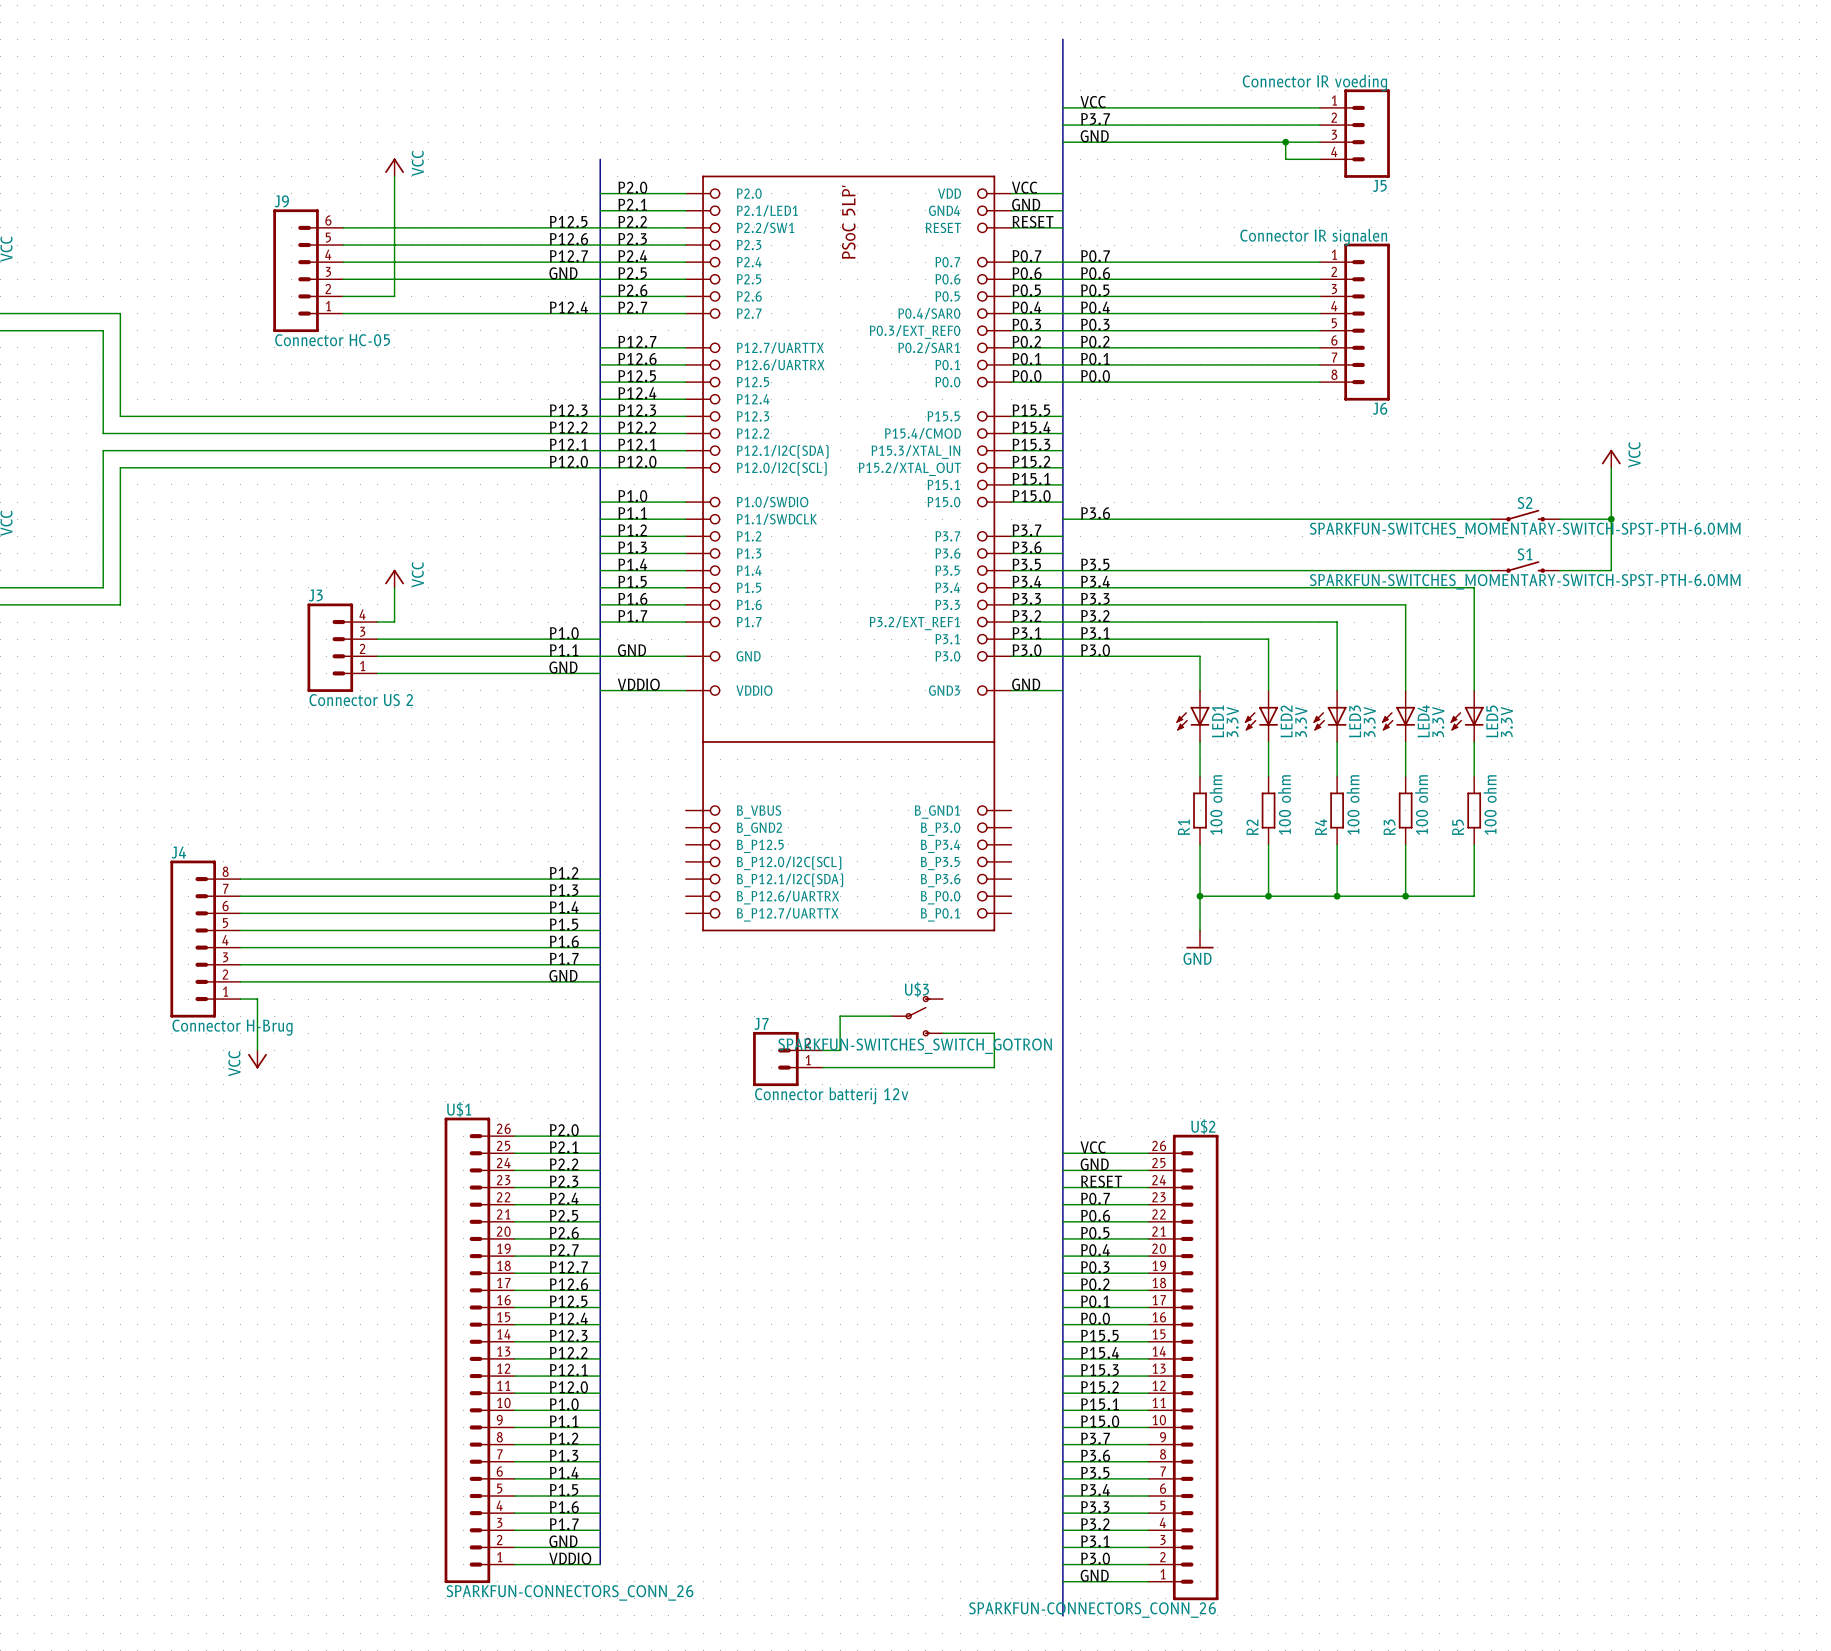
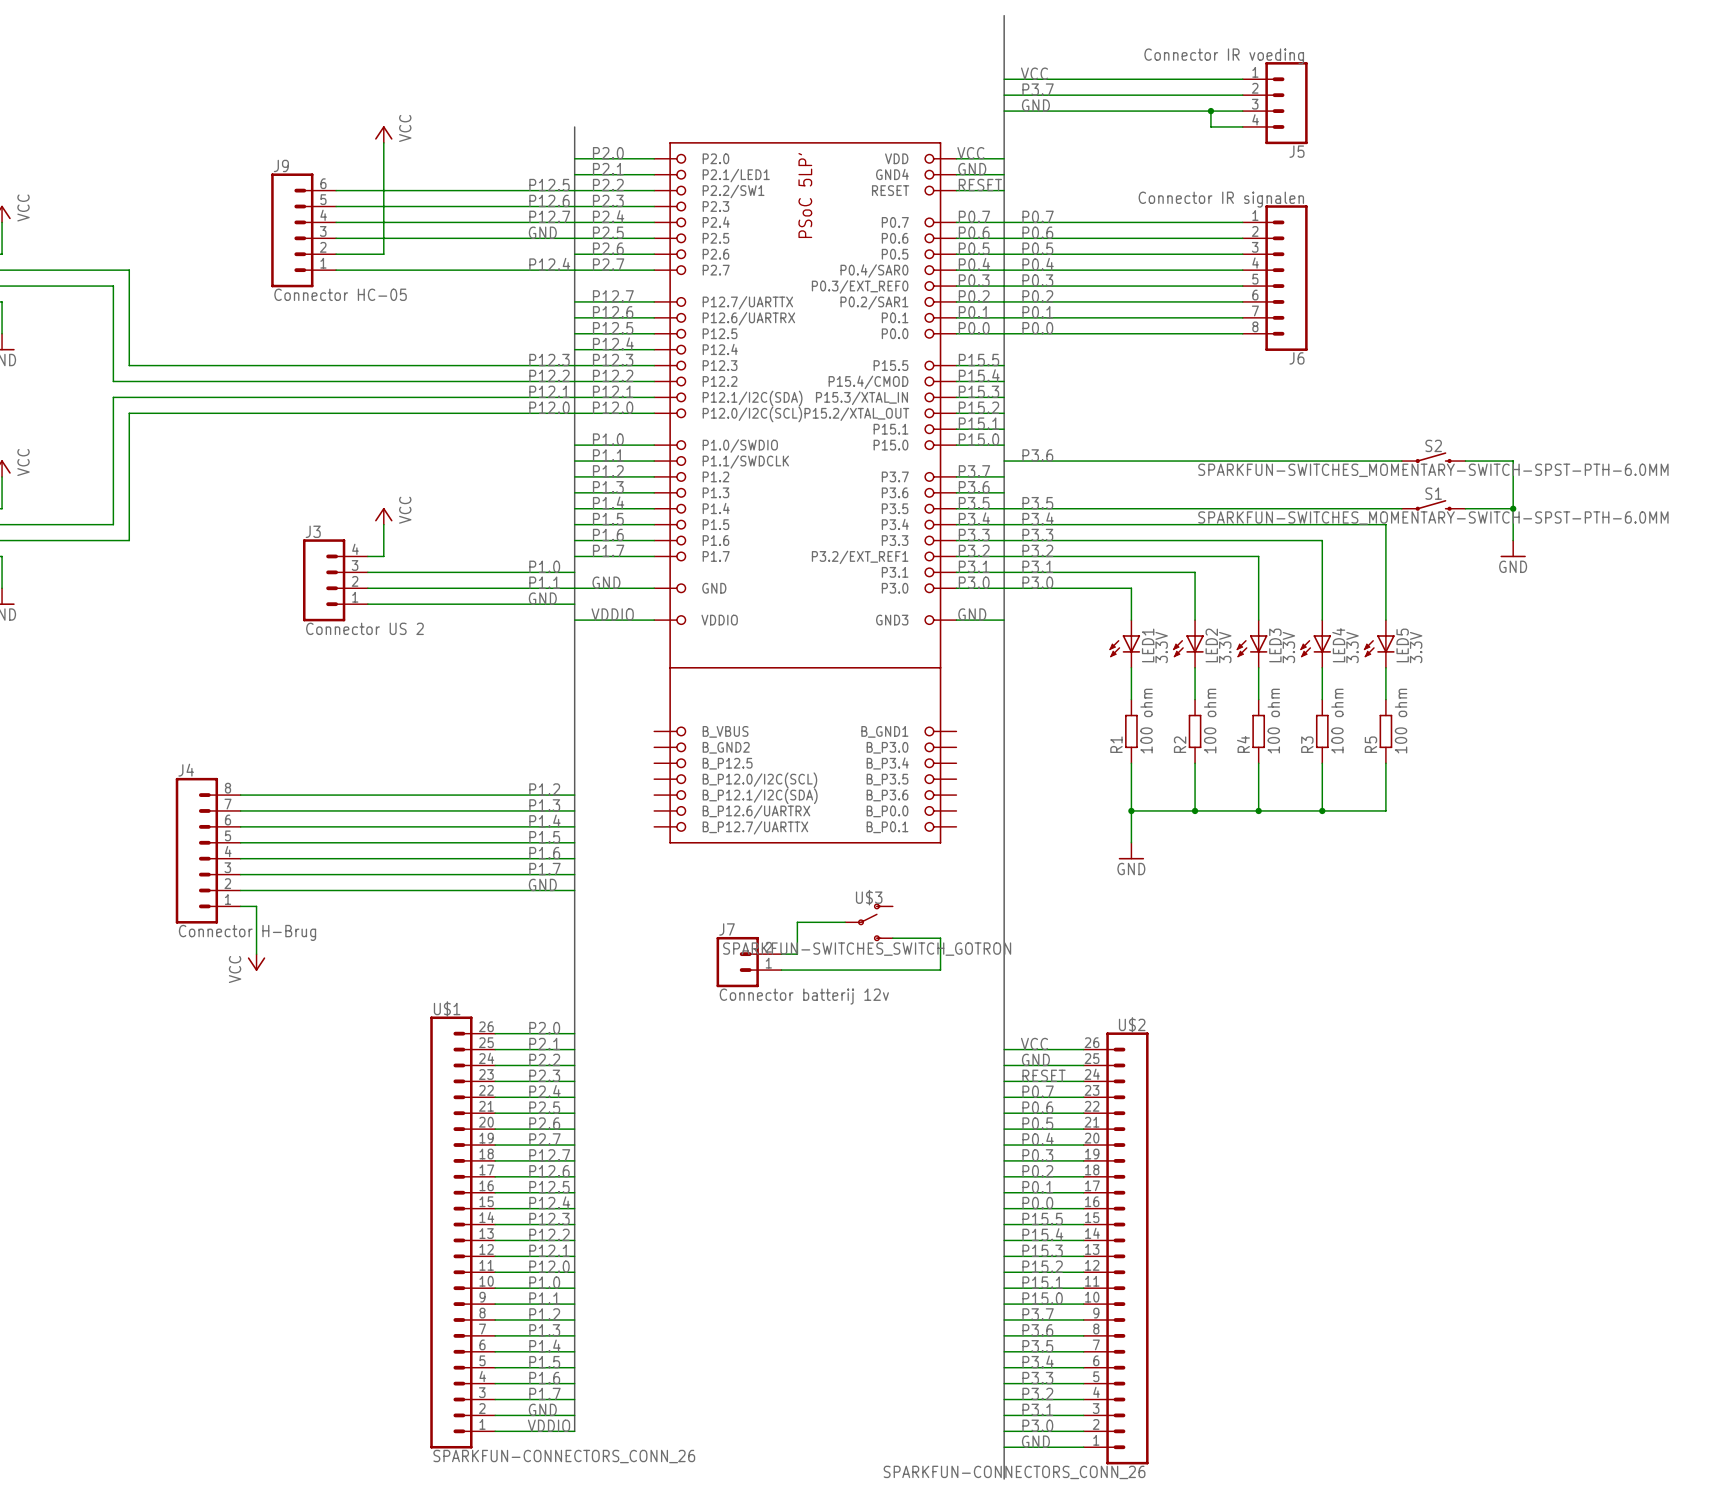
power symbol: VCC (1611, 458) -> none
wire: (1611, 467) (1611, 519) -> none
junction: (1611, 519) -> none
wire: none -> (1513, 508) (1513, 540)
junction: none -> (1513, 508)
power symbol: none -> GND (1513, 548)

